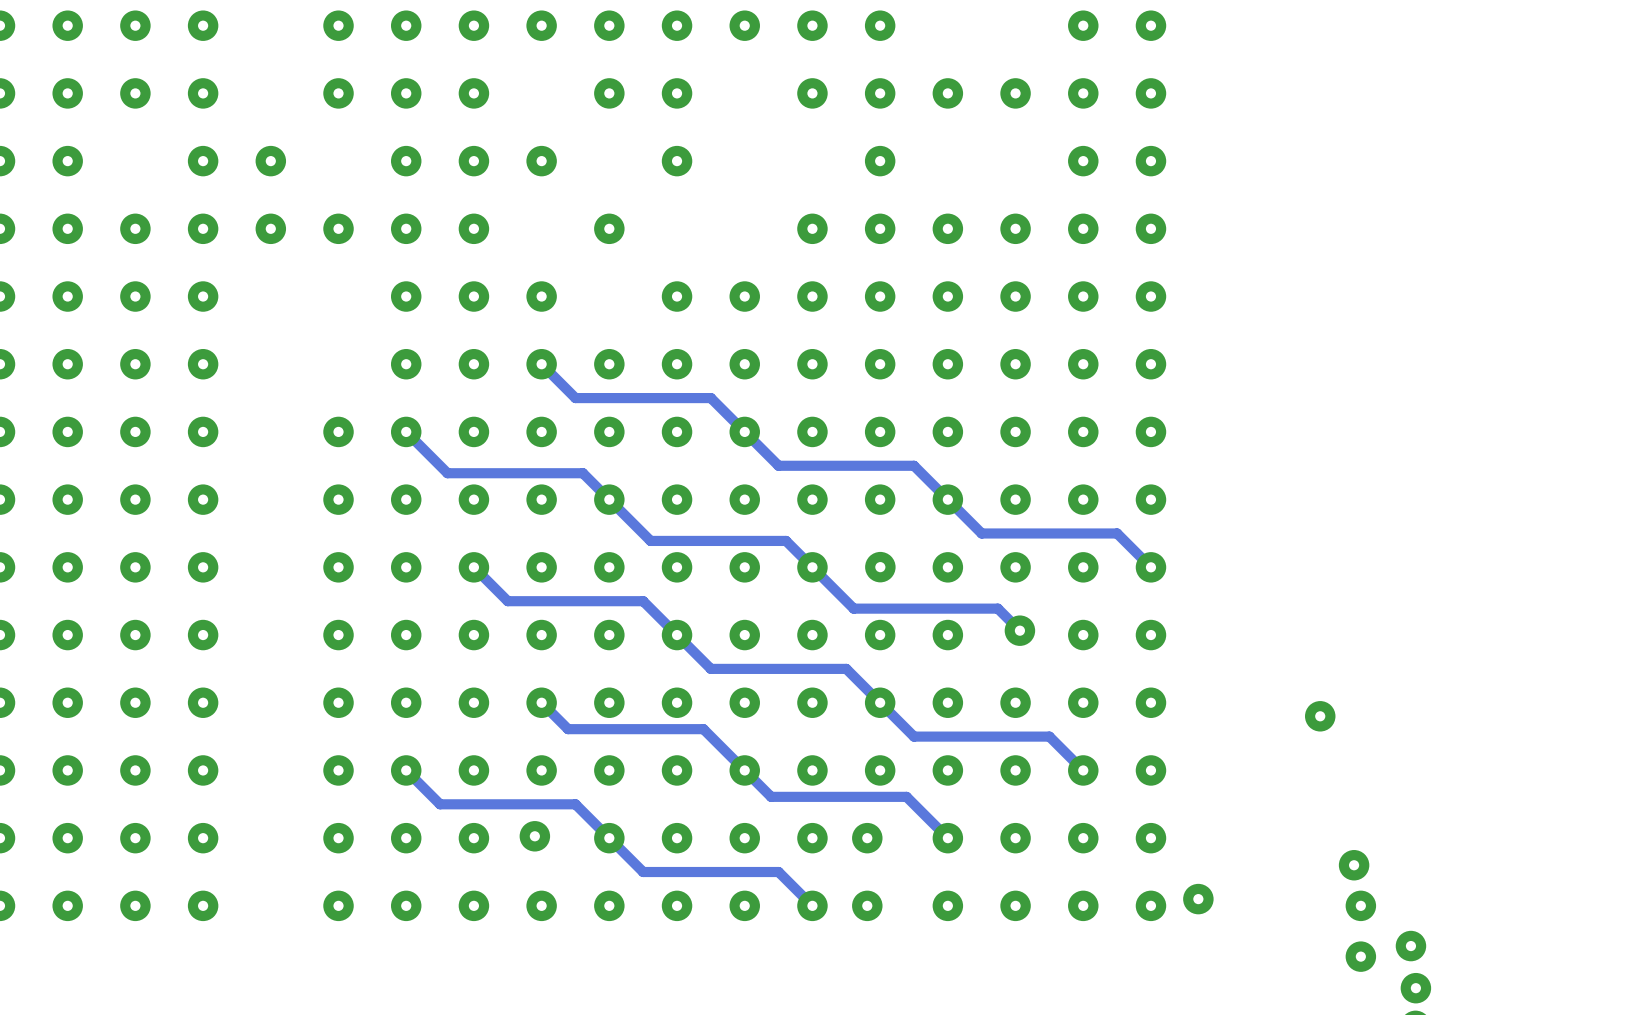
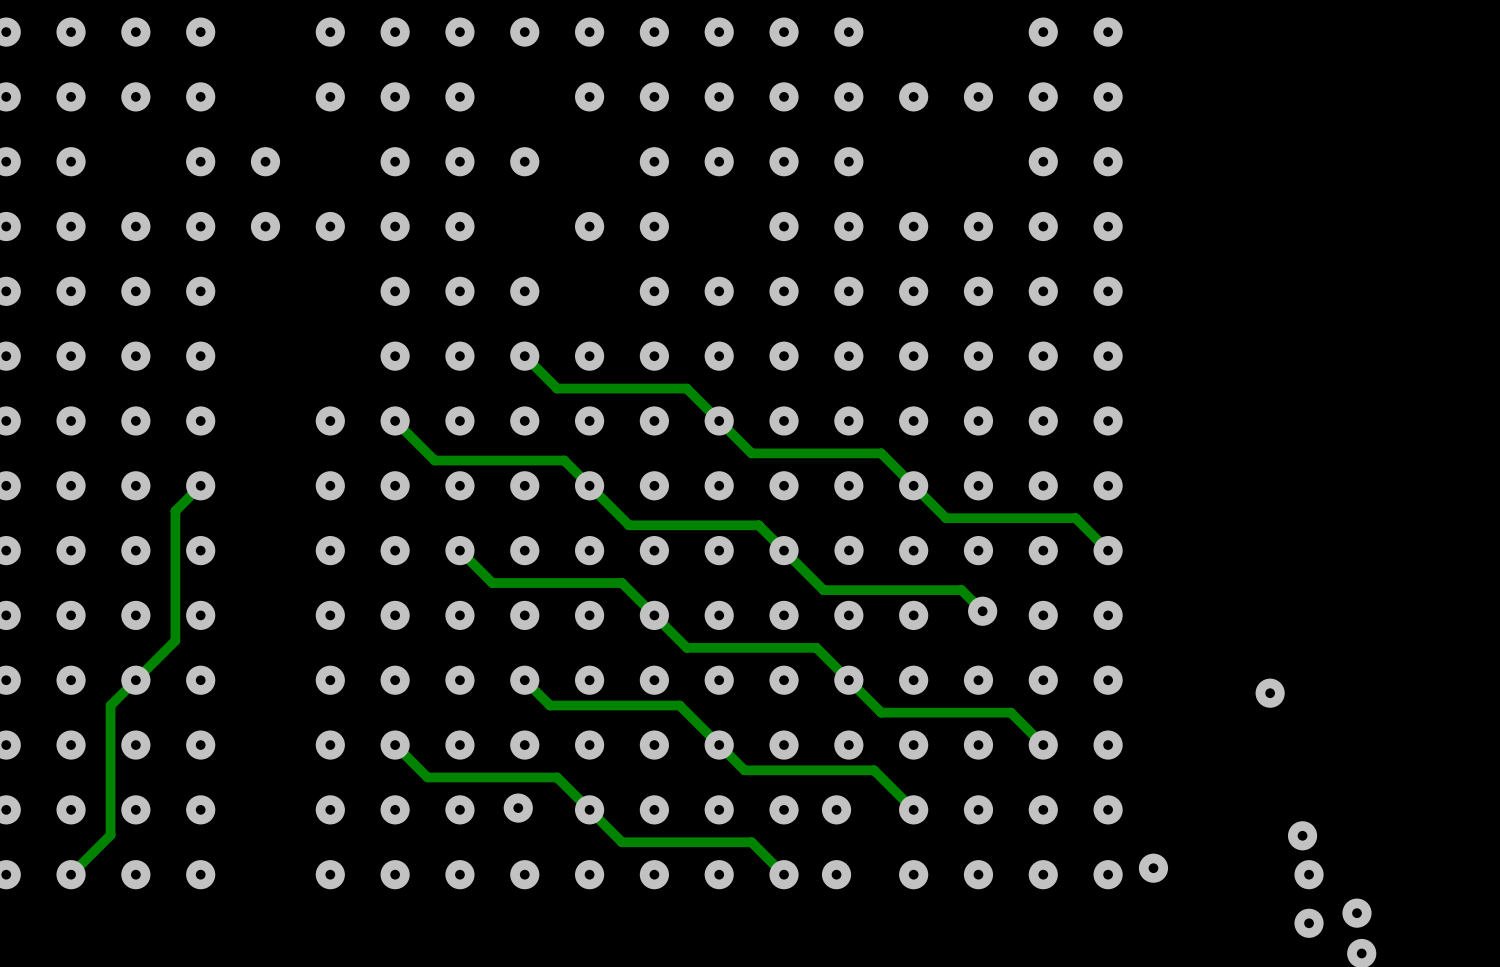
via: none -> (719, 96)
via: none -> (719, 161)
via: none -> (784, 161)
via: none -> (654, 226)
track: none -> (200, 485) (175, 511) (175, 640) (110, 705) (110, 835) (71, 874)

